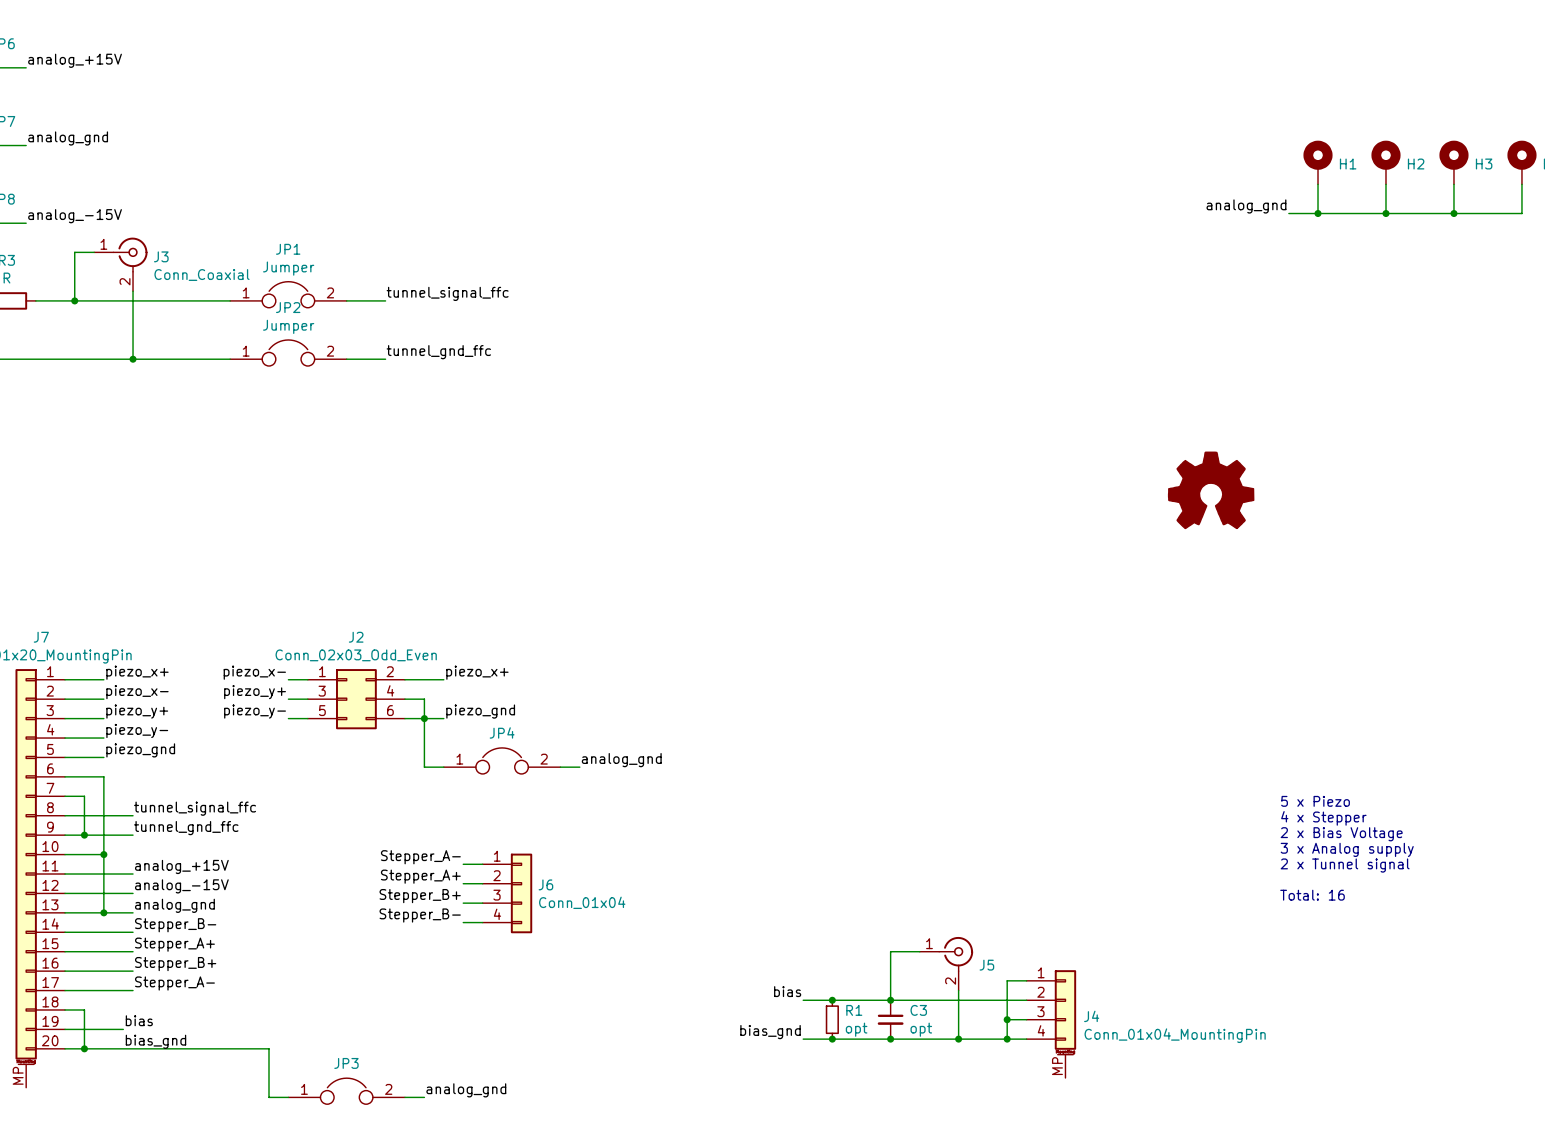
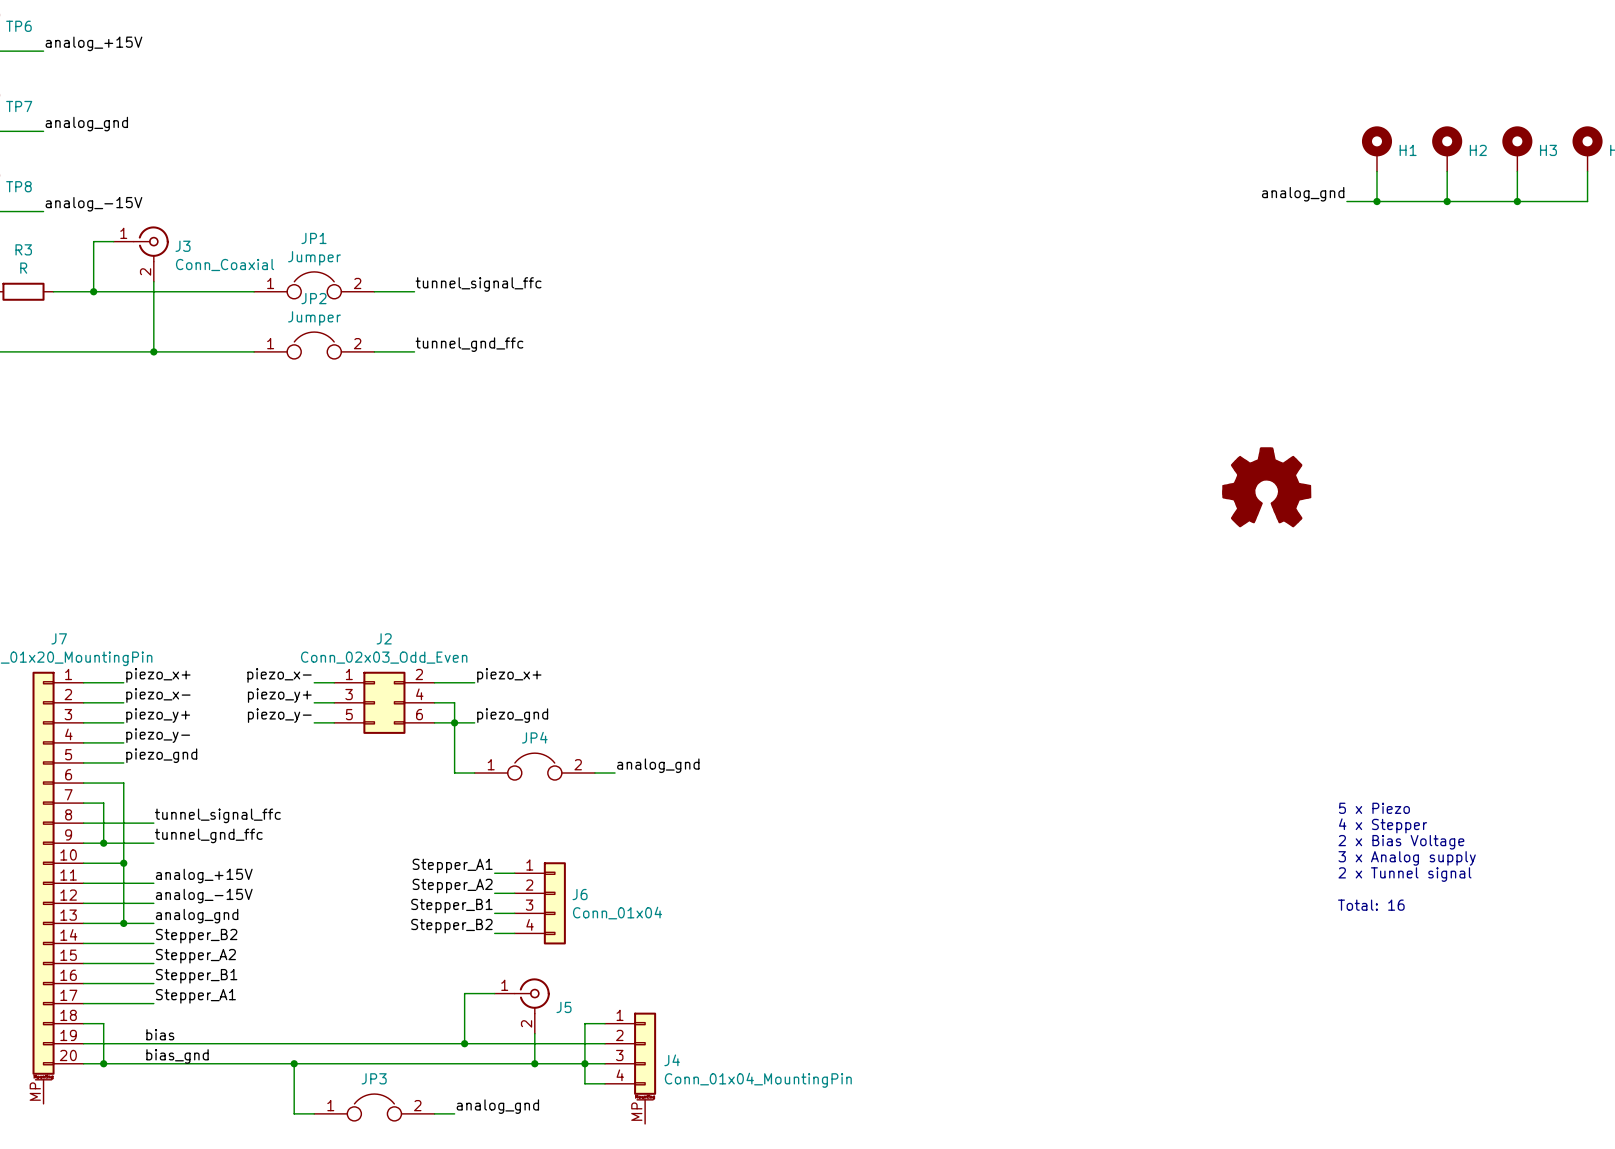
label: Stepper_A- (420, 857) -> Stepper_A1 (452, 865)
label: Stepper_A+ (420, 876) -> Stepper_A2 (452, 886)
label: Stepper_B+ (420, 896) -> Stepper_B1 (451, 906)
label: Stepper_B- (420, 915) -> Stepper_B2 (451, 926)
label: Stepper_B- (175, 925) -> Stepper_B2 (196, 936)
label: Stepper_A+ (174, 944) -> Stepper_A2 (195, 956)
wire: (919, 951) (890, 951) (890, 1000) -> none
J5 position: (946, 963) -> (522, 1006)
label: Stepper_B+ (175, 964) -> Stepper_B1 (196, 976)
wire: none -> (494, 993) (464, 993) (464, 1043)
wire: (1026, 980) (1007, 980) (1007, 1039) -> none
label: Stepper_A- (174, 983) -> Stepper_A1 (195, 996)
wire: (958, 990) (958, 1039) -> none
label: bias (787, 991) -> none
wire: (803, 1000) (1026, 1000) -> none
junction: (832, 1000) -> none
junction: (890, 1000) -> none
wire: none -> (604, 1023) (584, 1023) (584, 1083) (604, 1083)
wire: none -> (534, 1033) (534, 1063)
R1: opt (832, 1019) -> none
C3: opt (890, 1019) -> none
wire: (1007, 1019) (1026, 1019) -> none
junction: (1007, 1019) -> none
J4 position: (1051, 1024) -> (630, 1068)
wire: none -> (143, 1043) (604, 1043)
junction: none -> (464, 1043)
label: bias_gnd (770, 1032) -> none
wire: (803, 1039) (1026, 1039) -> none
junction: (832, 1039) -> none
junction: (890, 1039) -> none
junction: (958, 1039) -> none
junction: (1007, 1039) -> none
wire: none -> (294, 1063) (604, 1063)
junction: none -> (294, 1063)
junction: none -> (534, 1063)
junction: none -> (584, 1063)

